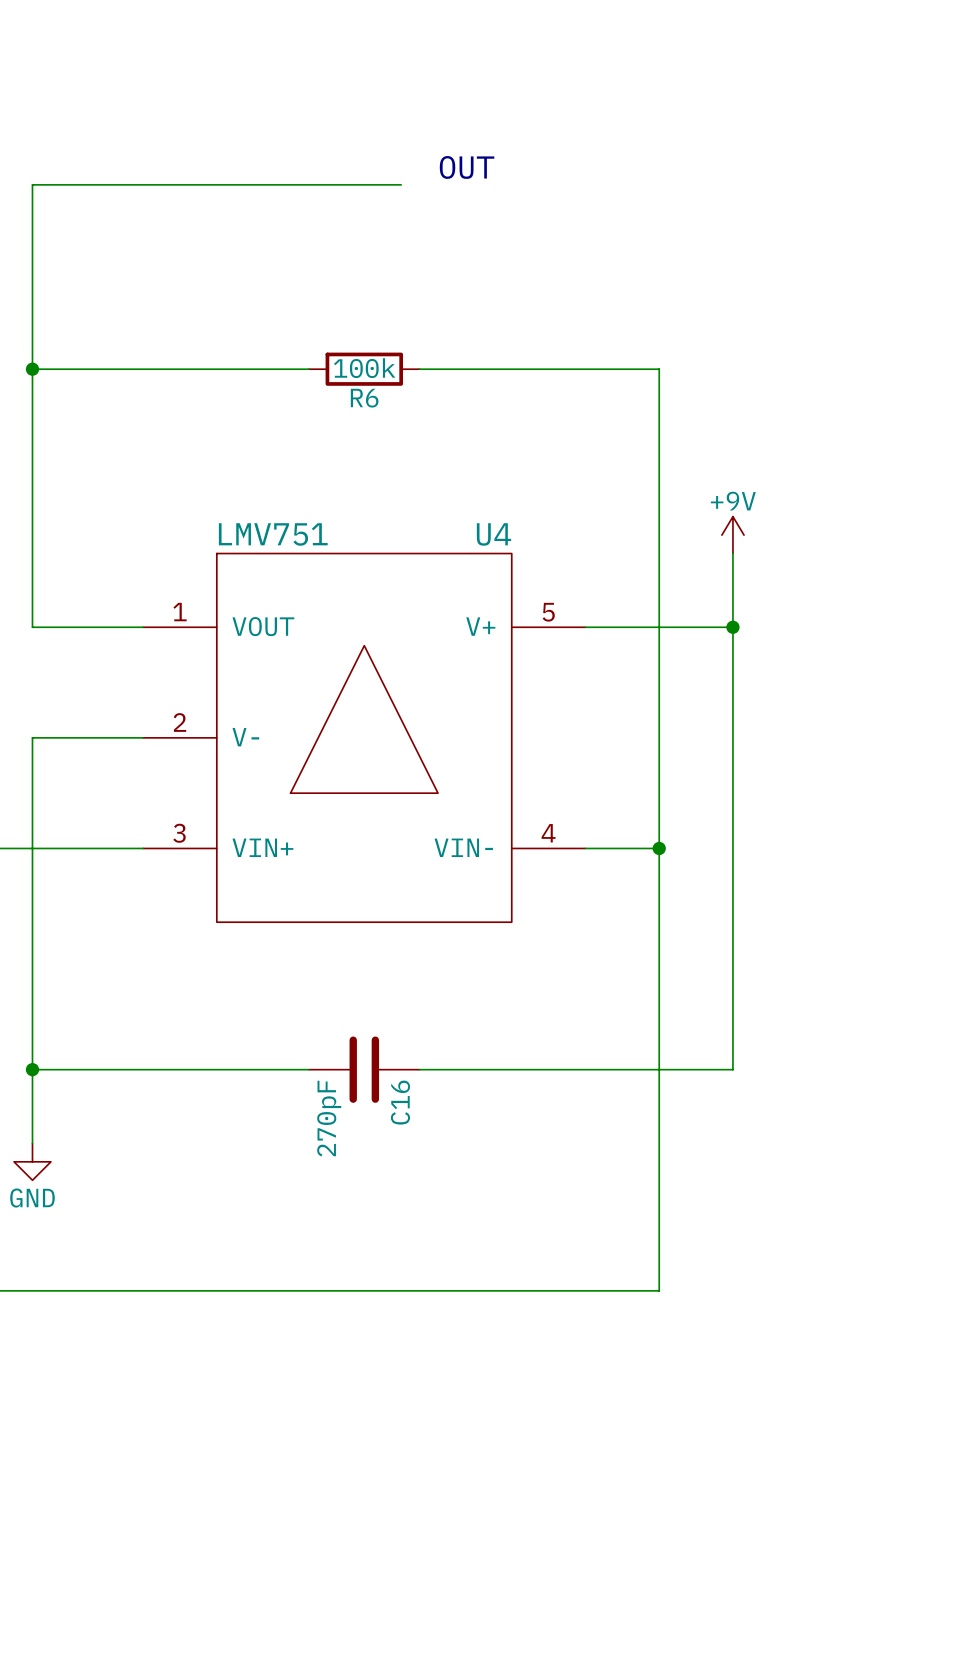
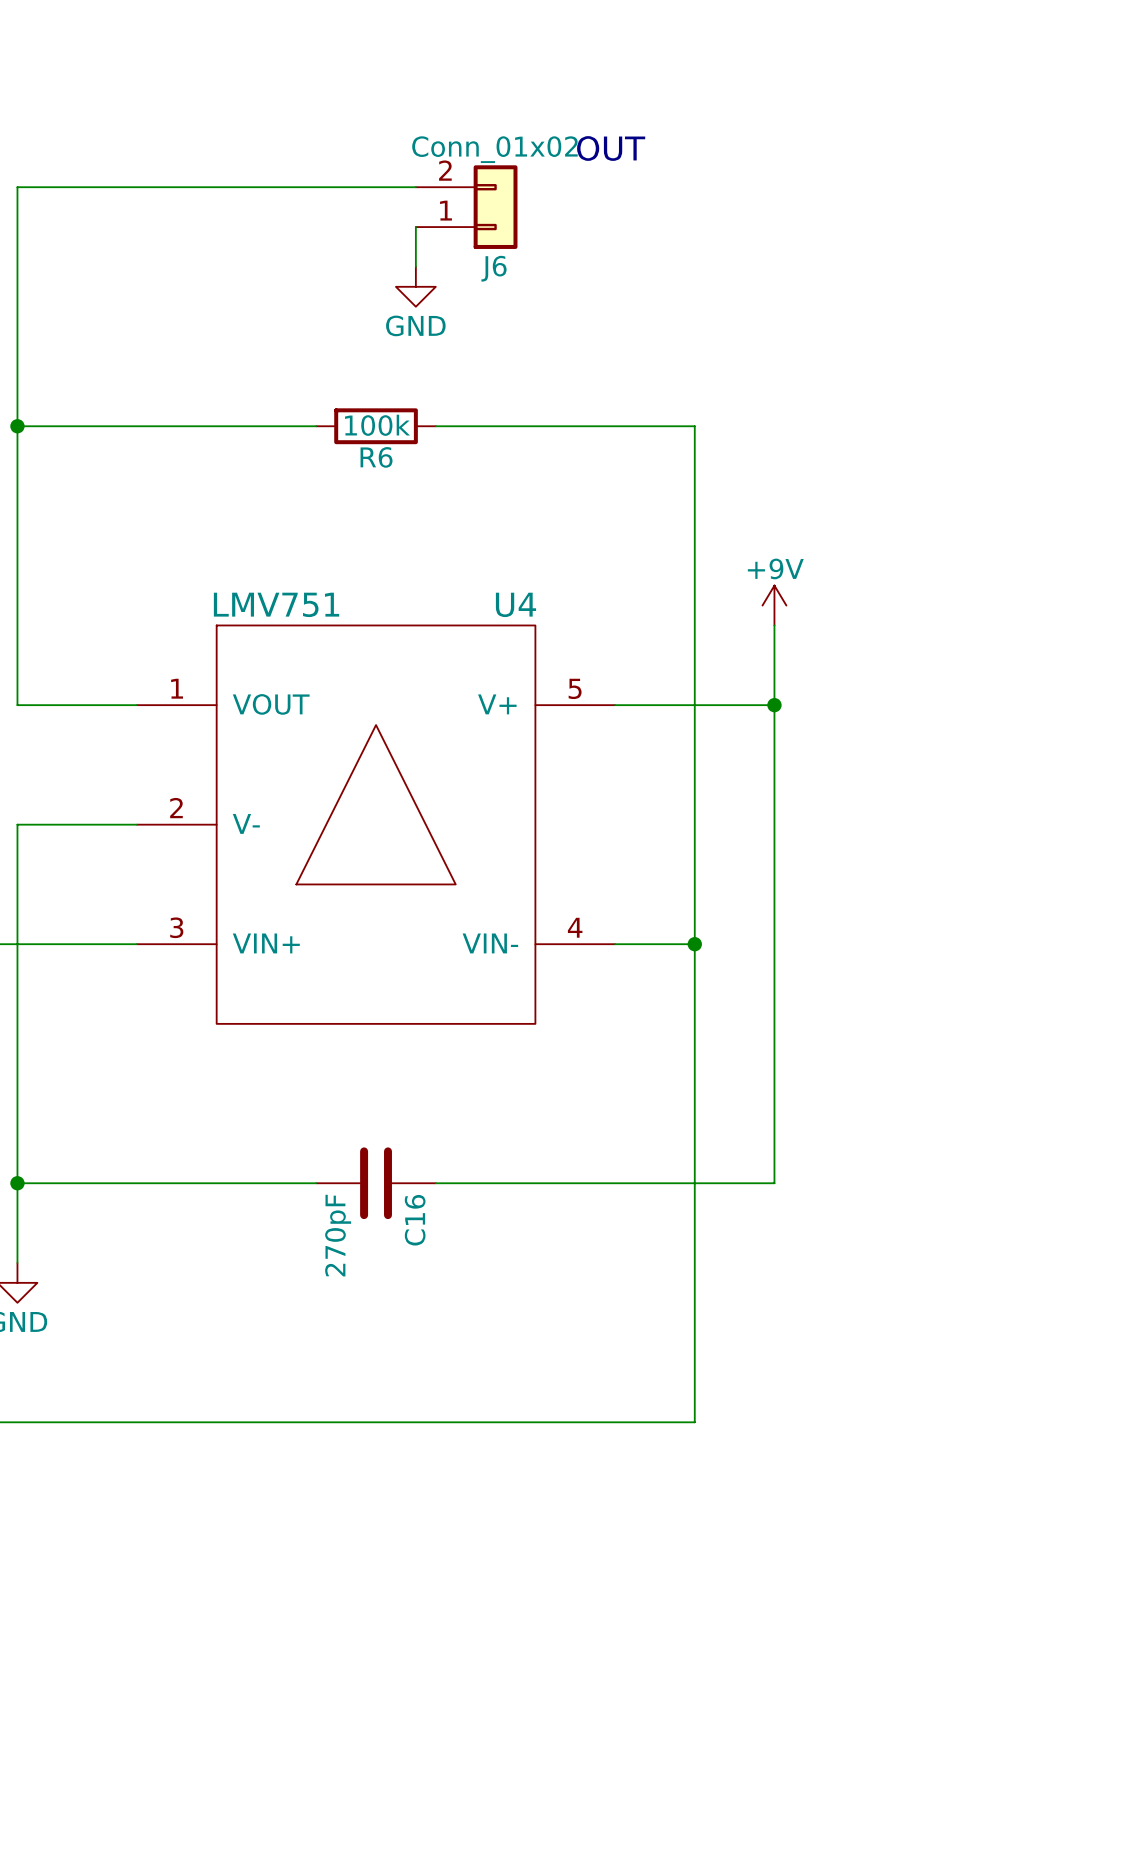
J6: none -> Conn_01x02 (466, 207)
text position: OUT (467, 167) -> OUT (611, 148)
wire: (32, 184) (401, 184) -> (17, 227) (17, 187) (415, 187)
wire: none -> (415, 227) (415, 266)
power symbol: none -> GND (415, 286)

